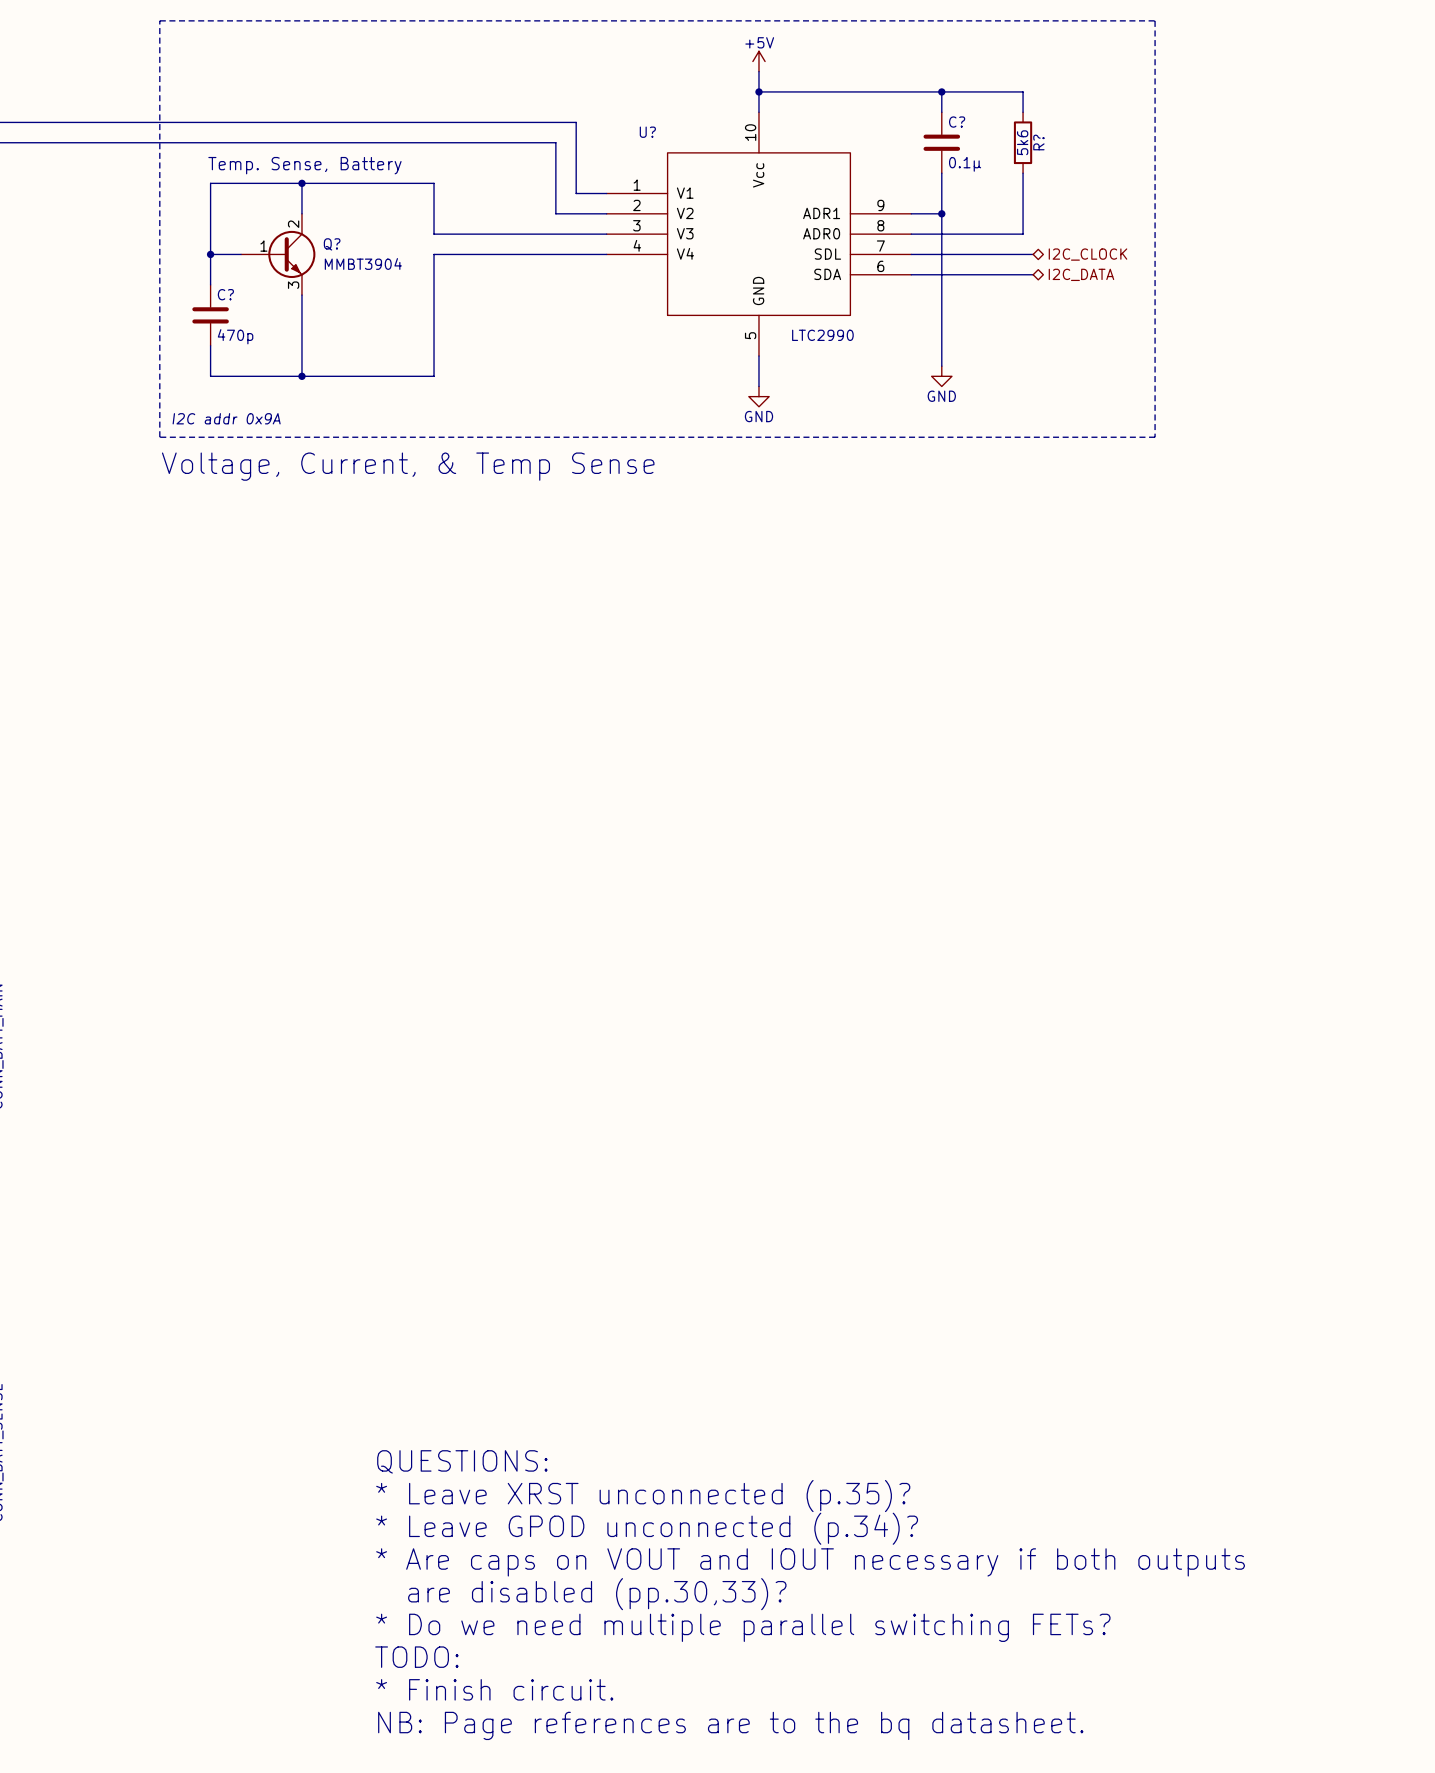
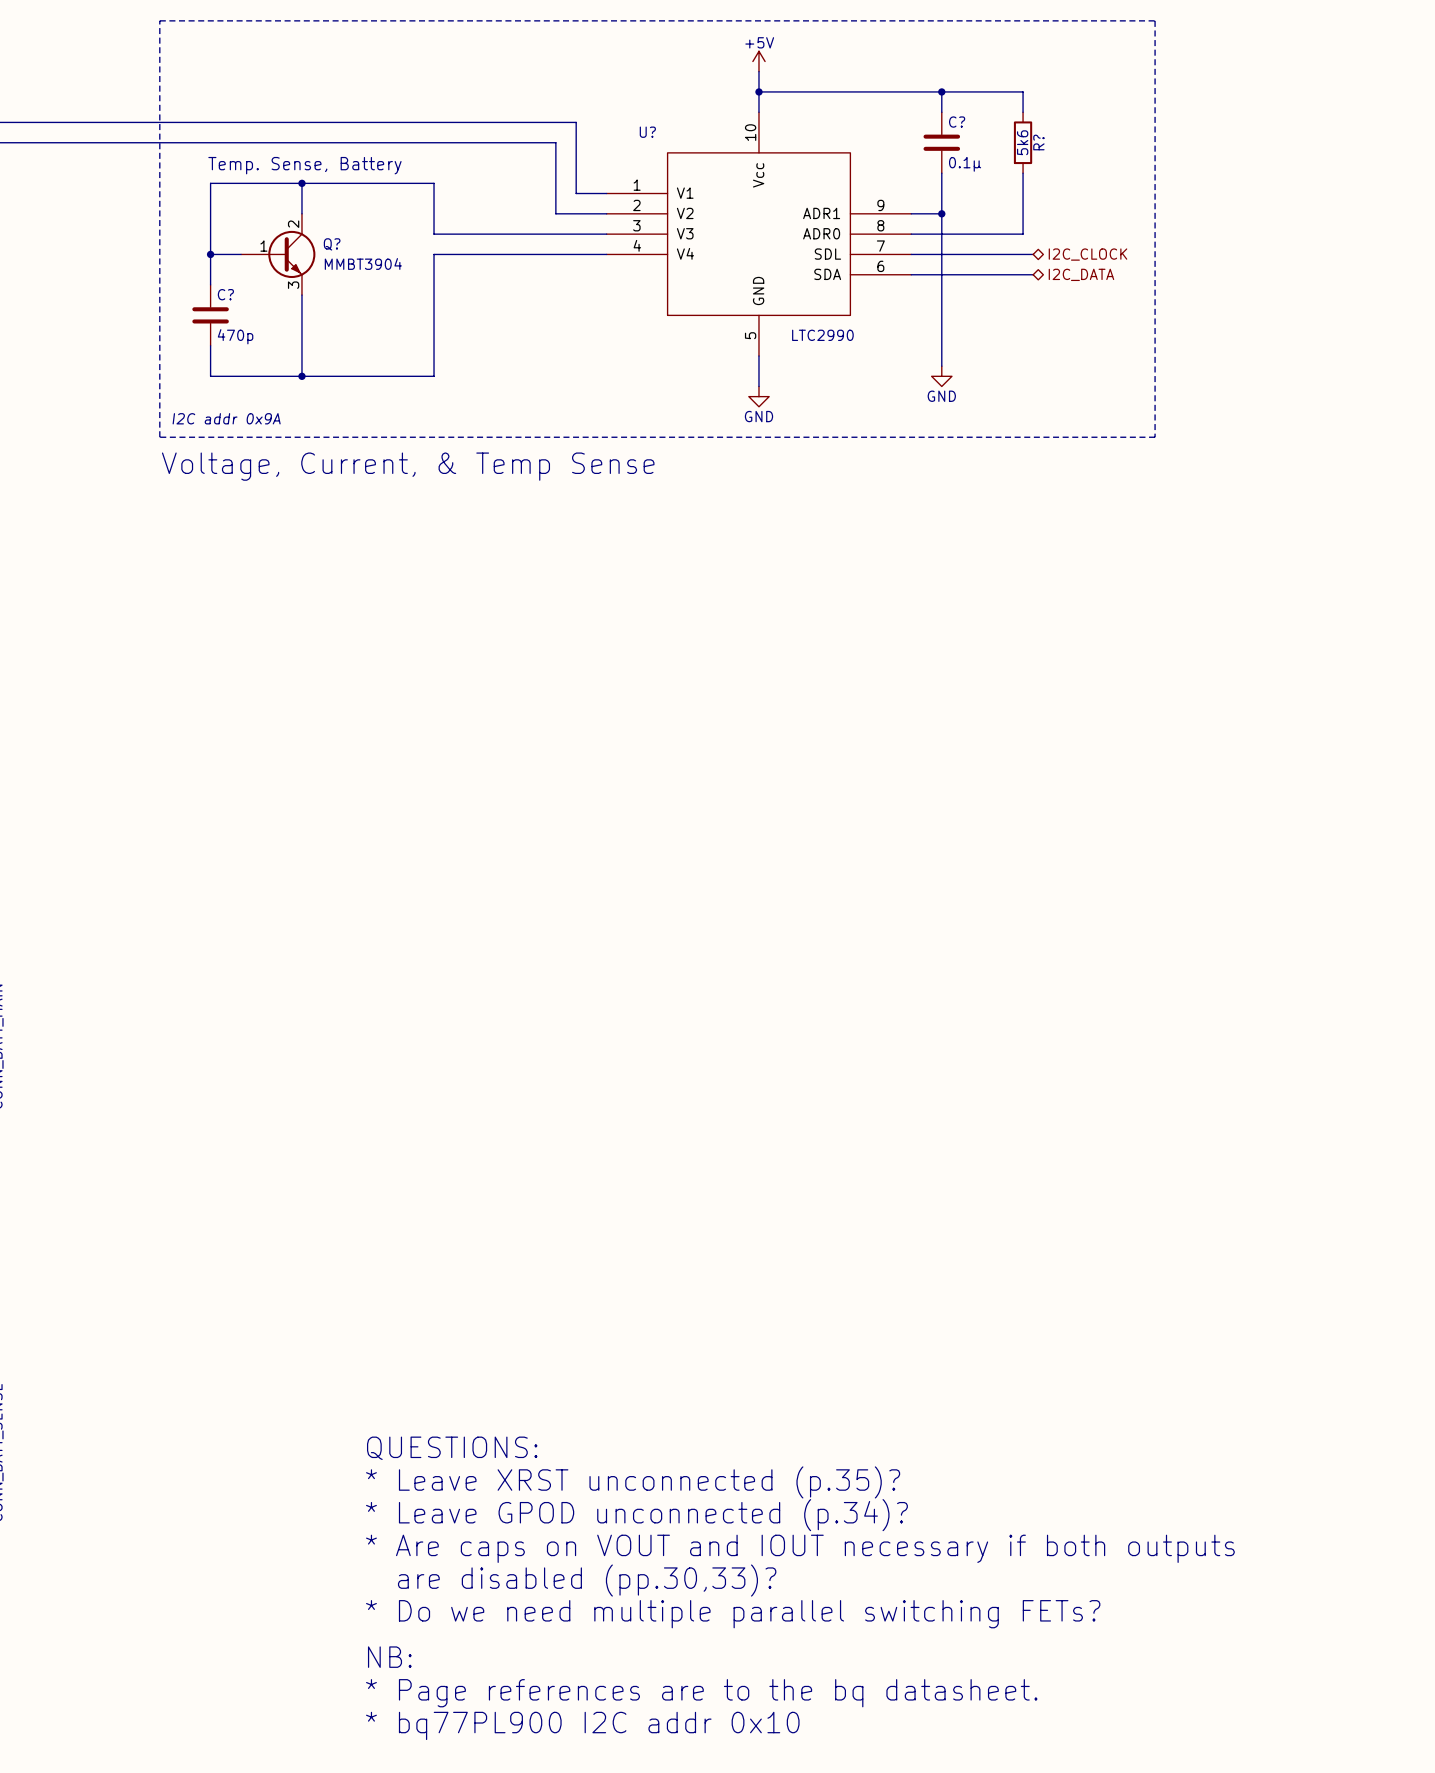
text position: QUESTIONS: (462, 1461) -> QUESTIONS: (452, 1448)
text position: * Leave XRST unconnected (p.35)? (643, 1496) -> * Leave XRST unconnected (p.35)? (633, 1482)
text position: * Leave GPOD unconnected (p.34)? (647, 1528) -> * Leave GPOD unconnected (p.34)? (636, 1515)
text position: * Are caps on VOUT and IOUT necessary if both outputs (810, 1562) -> * Are caps on VOUT and IOUT necessary if both outputs (800, 1548)
text position: are disabled (pp.30,33)? (597, 1594) -> are disabled (pp.30,33)? (587, 1580)
text position: * Do we need multiple parallel switching FETs? (743, 1627) -> * Do we need multiple parallel switching FETs? (733, 1614)
text: none -> NB: (389, 1657)
text: TODO: (416, 1657) -> none
text: * Finish circuit. (494, 1689) -> none
text: none -> * bq77PL900 I2C addr 0x10 (582, 1725)
text: NB: Page references are to the bq datasheet. (730, 1725) -> * Page references are to the bq datasheet. (701, 1693)

